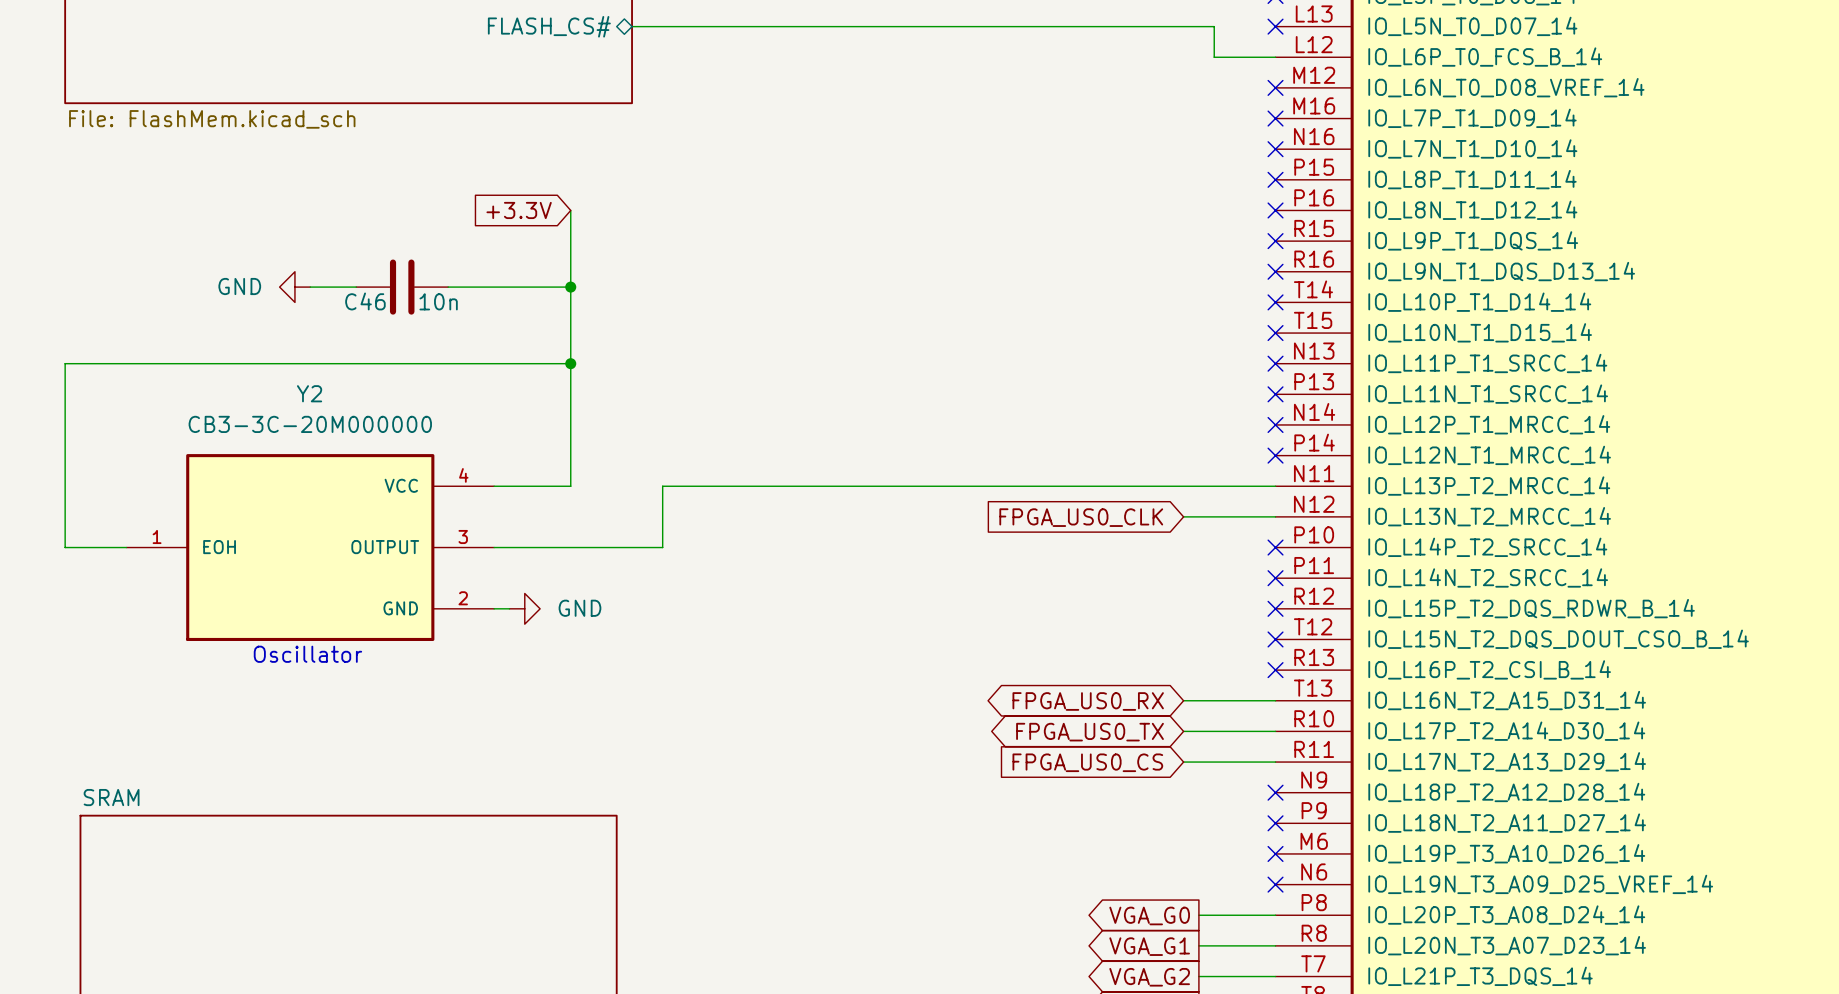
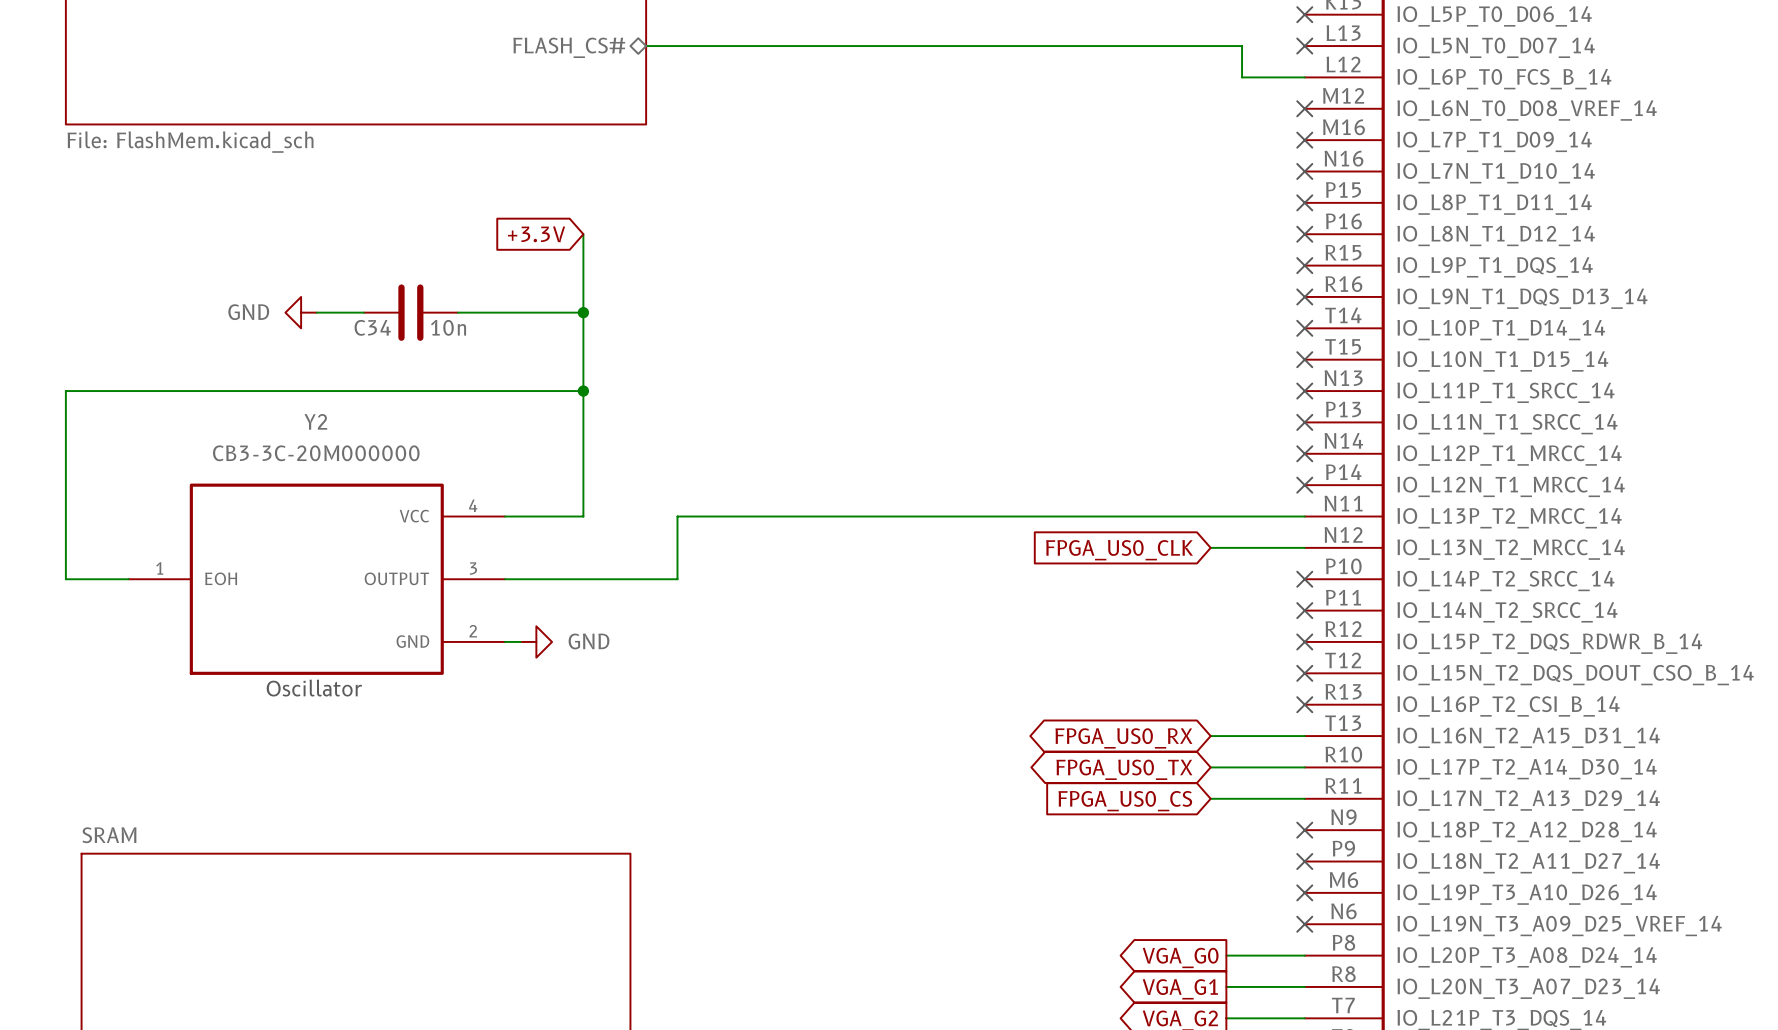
C46 name: C46 (365, 301) -> C34 (372, 327)

